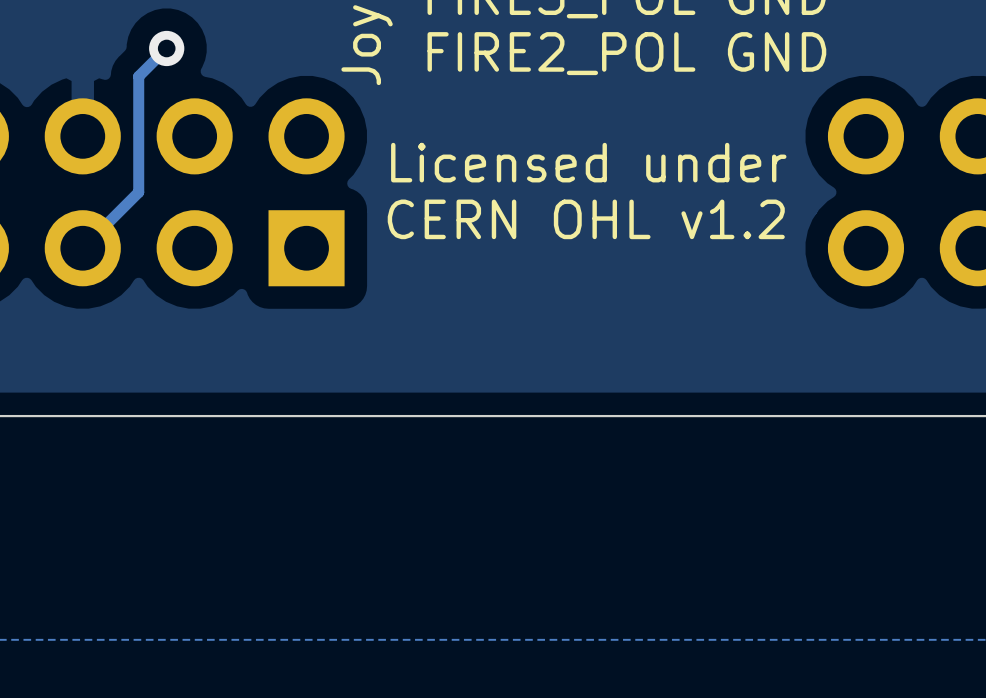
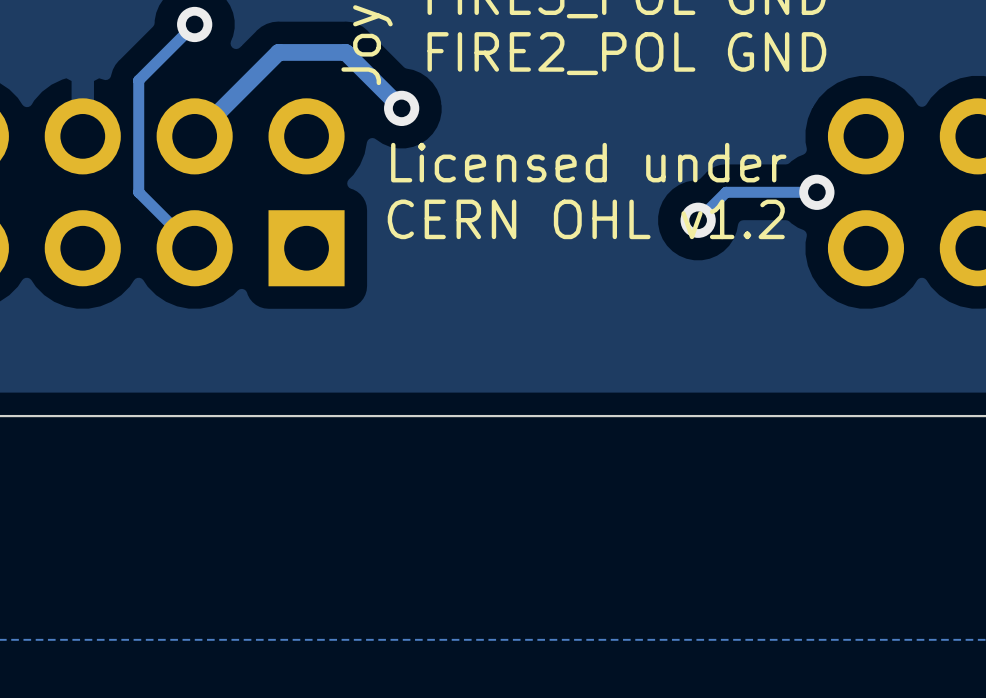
track: (166, 48) (138, 76) (138, 80) -> (194, 24) (138, 80)
via position: (166, 48) -> (194, 24)
track: none -> (401, 108) (345, 52) (278, 52) (194, 136)
via: none -> (401, 108)
track: (138, 192) (82, 248) -> (138, 192) (194, 248)
track: none -> (816, 192) (726, 192) (698, 220)
via: none -> (816, 192)
via: none -> (698, 220)

